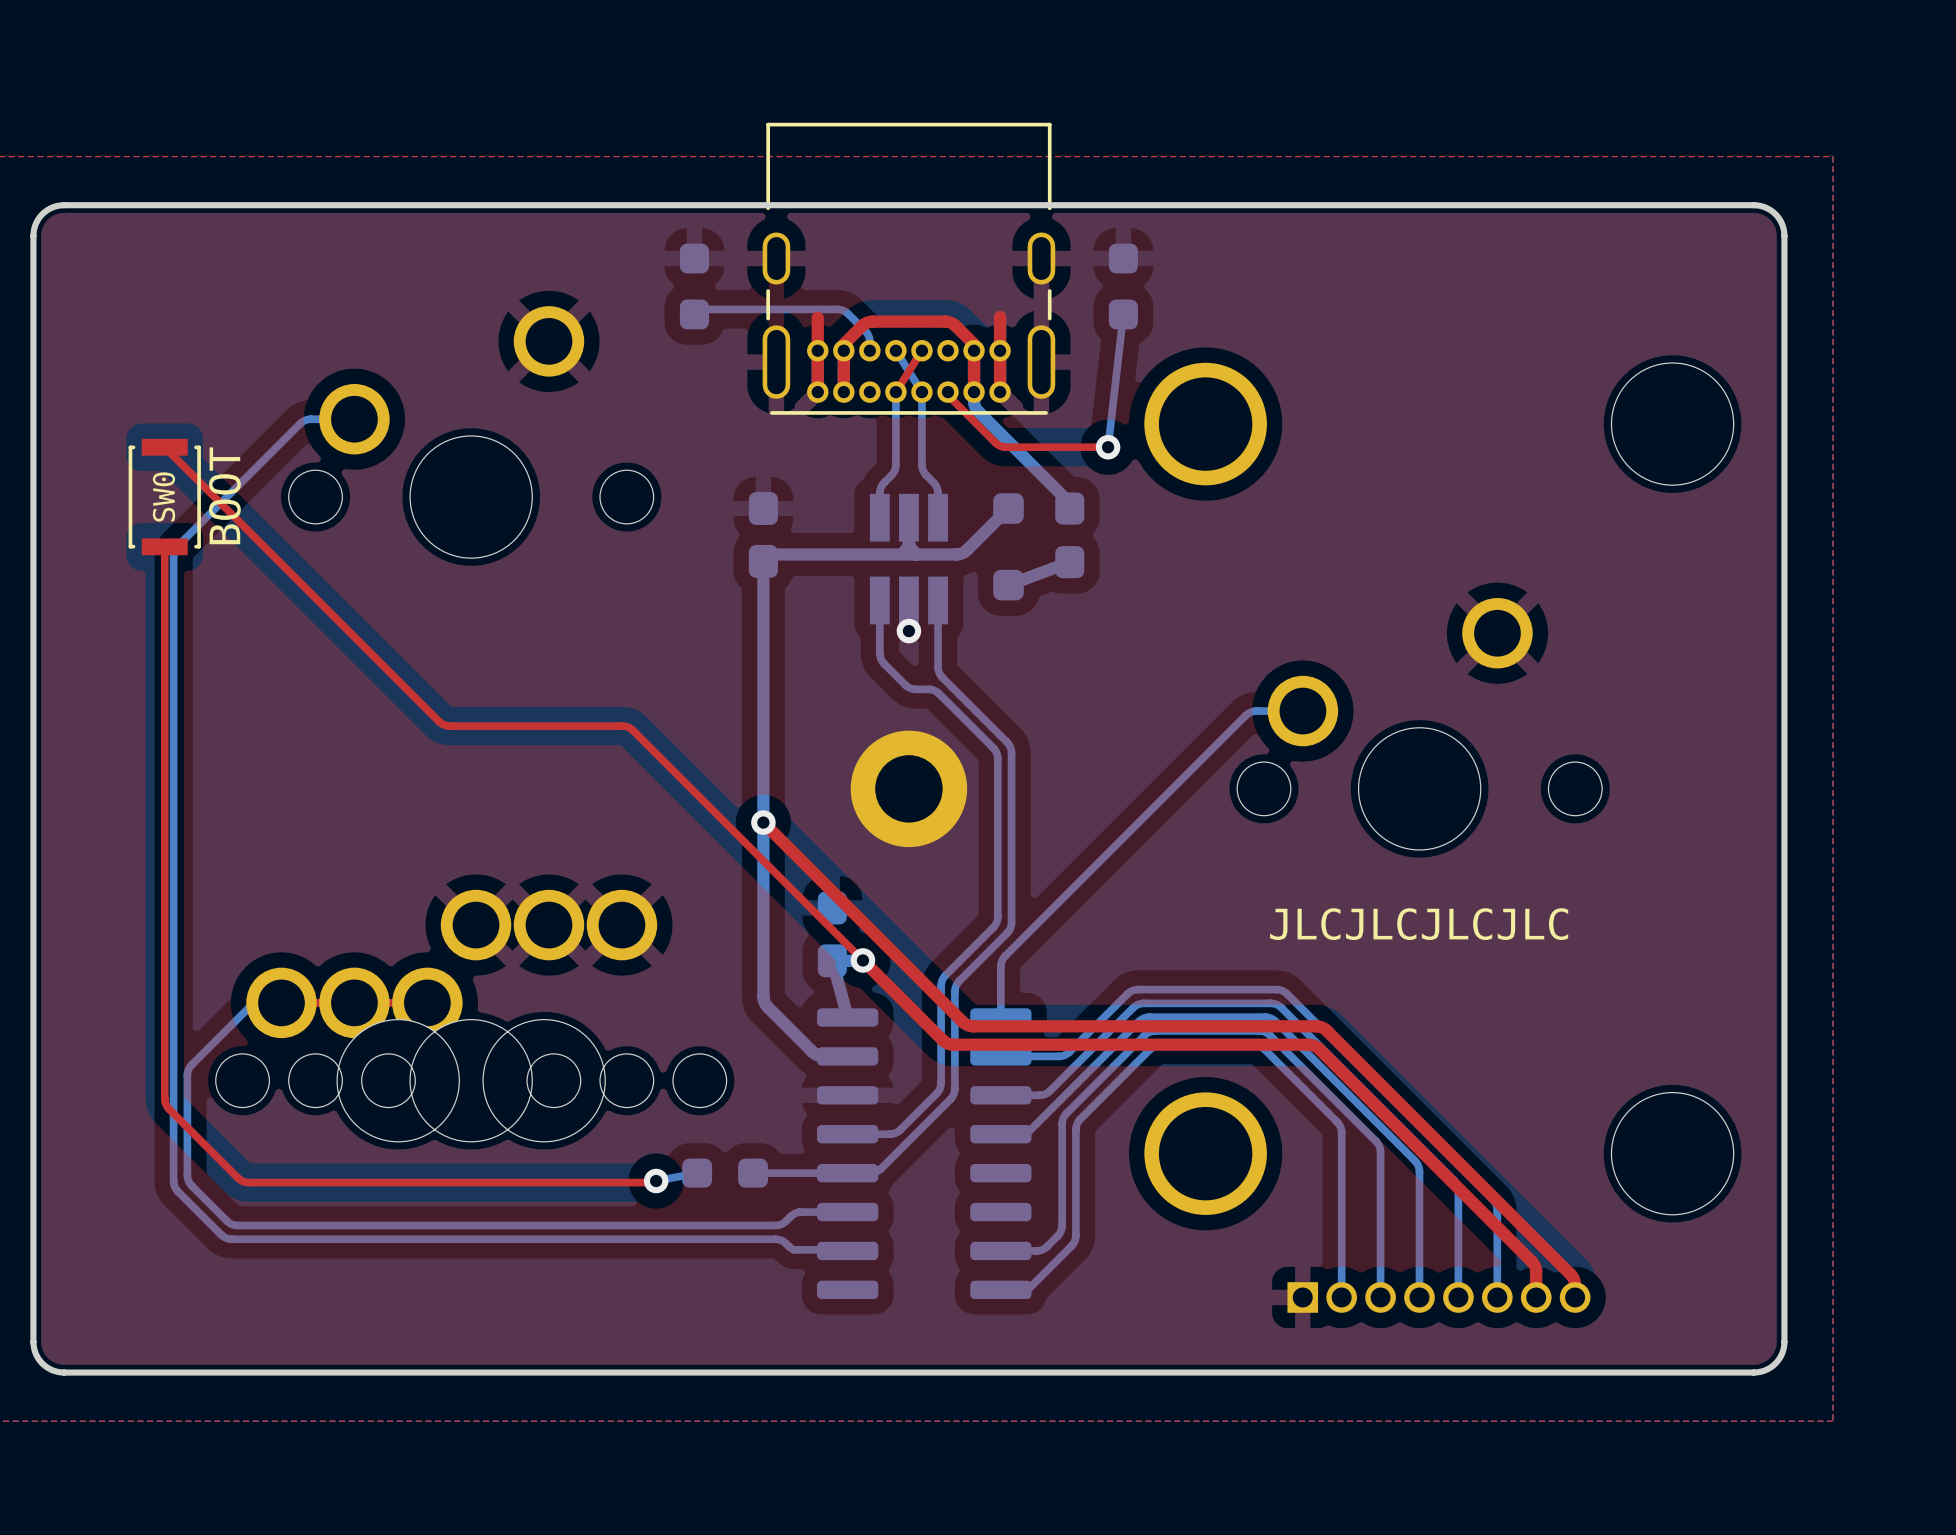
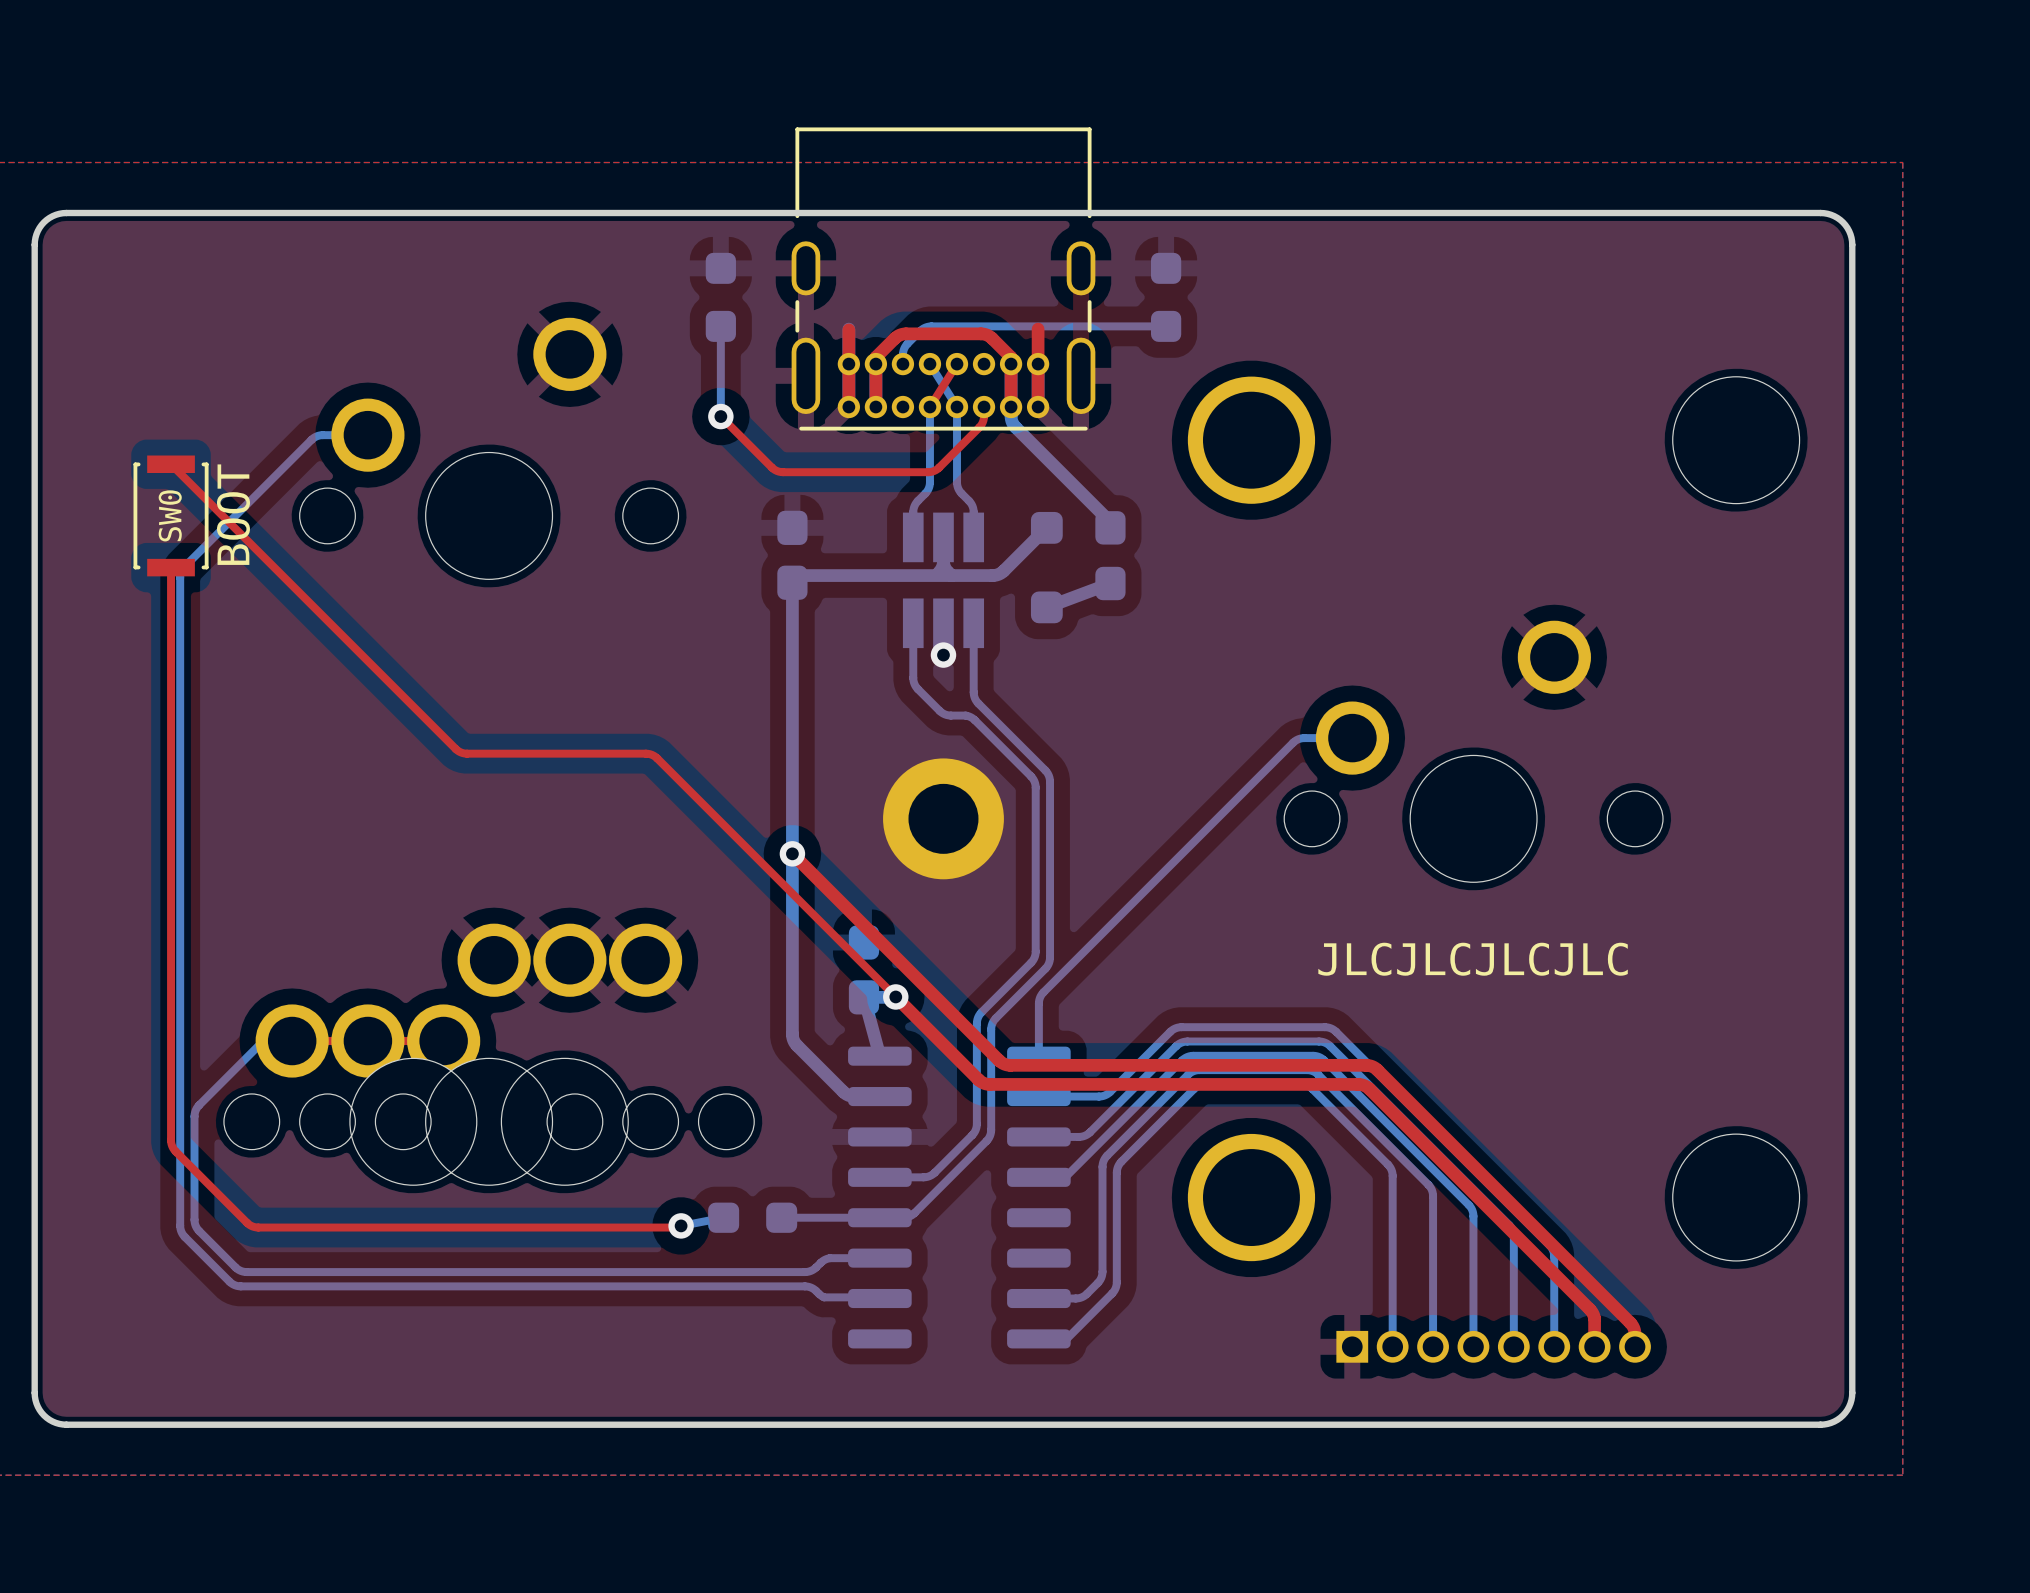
bottom track: (699, 309) (839, 309) (846, 312) (865, 331) (869, 341) -> none
bottom track: none -> (720, 326) (720, 416)
bottom track: (1123, 314) (1108, 447) -> (1166, 326) (929, 326) (921, 329) (907, 343) (902, 354)
top track: none -> (984, 407) (983, 418) (980, 425) (938, 468) (927, 472) (778, 471) (771, 467) (720, 416)
top track: (947, 395) (1001, 446) (1108, 447) -> none
via: none -> (720, 416)
via: (1108, 447) -> none

